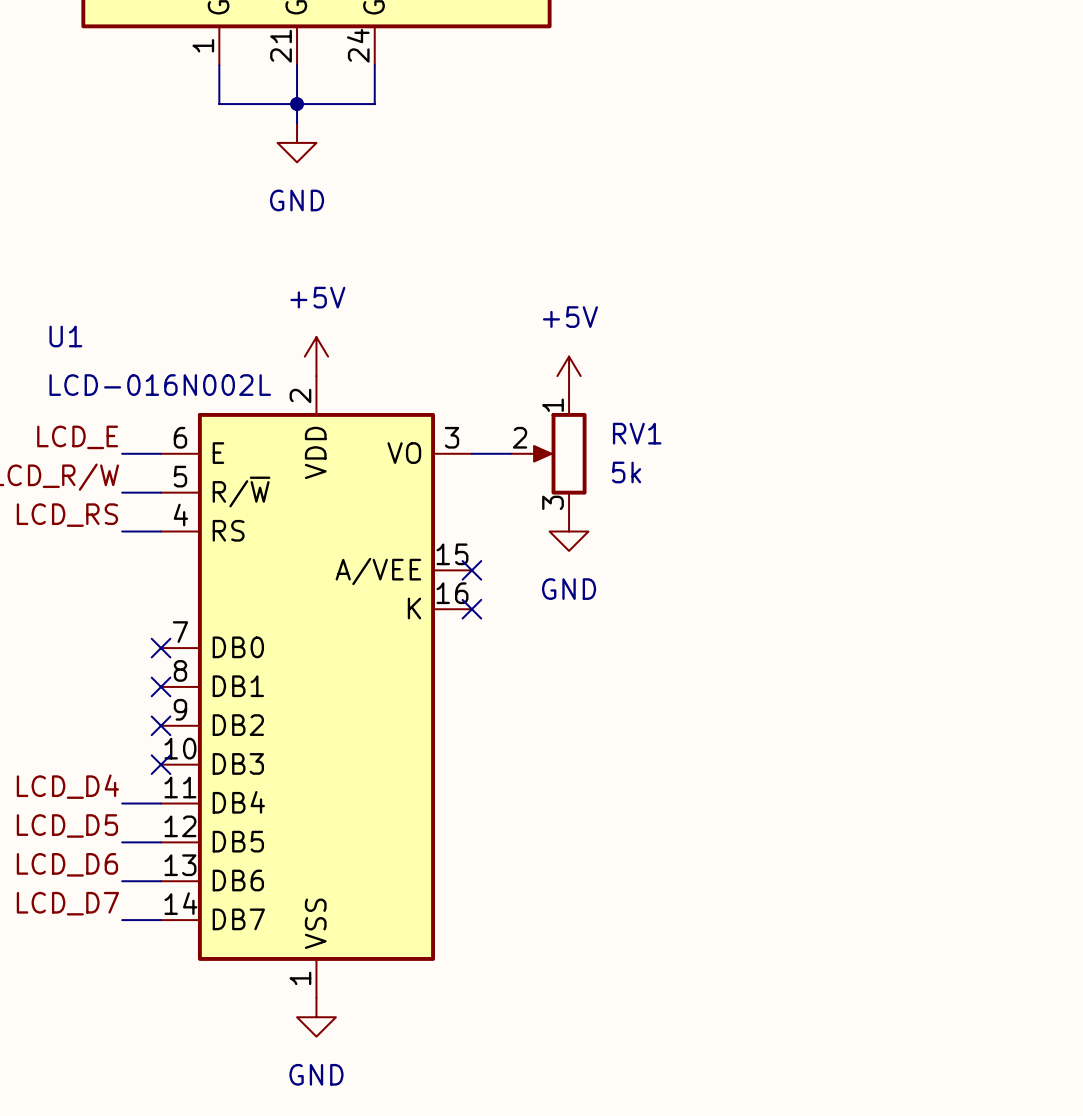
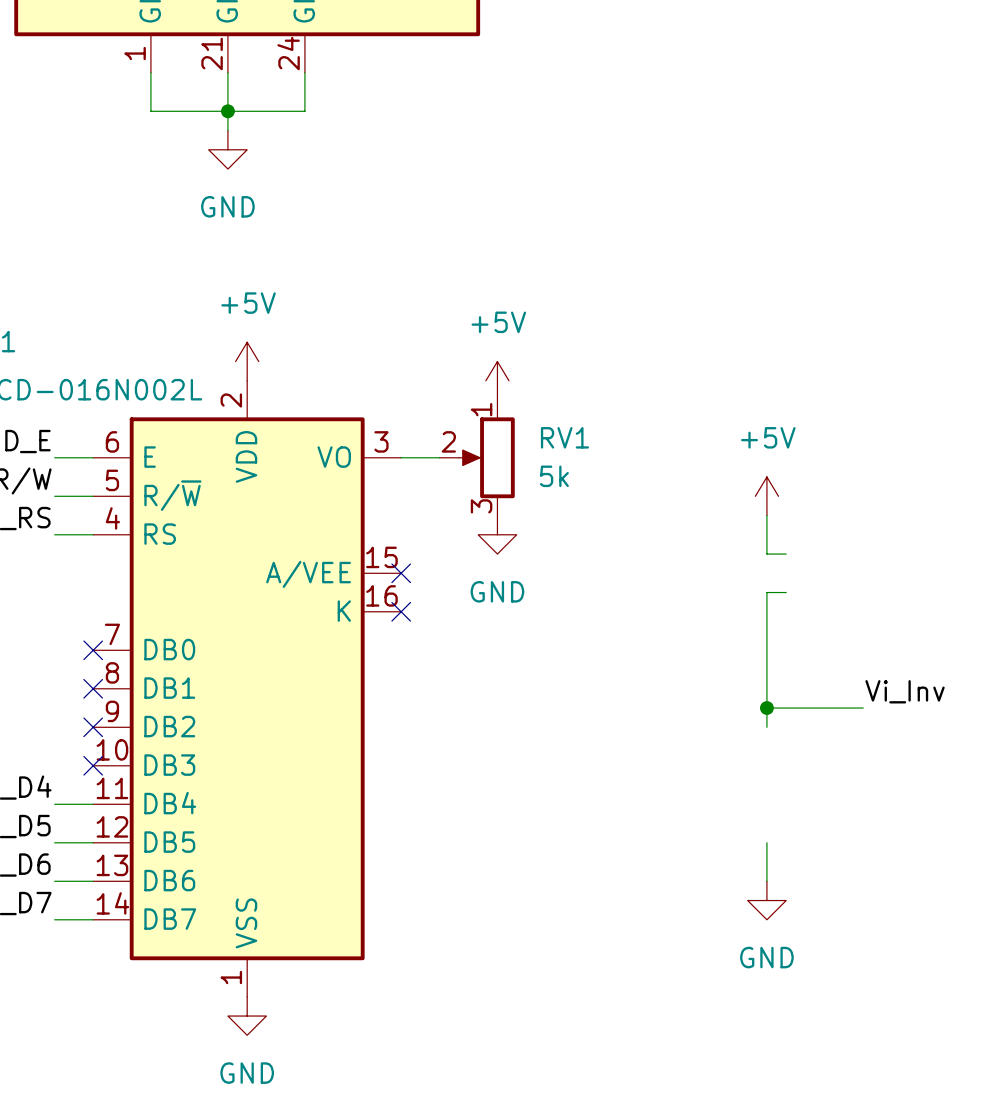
power symbol: none -> +5V (766, 496)
wire: none -> (766, 515) (766, 554) (786, 554)
wire: none -> (786, 592) (766, 592) (766, 727)
label: none -> Vi_Inv (905, 691)
wire: none -> (766, 708) (863, 708)
junction: none -> (766, 708)
wire: none -> (766, 842) (766, 881)
power symbol: none -> GND (766, 900)

